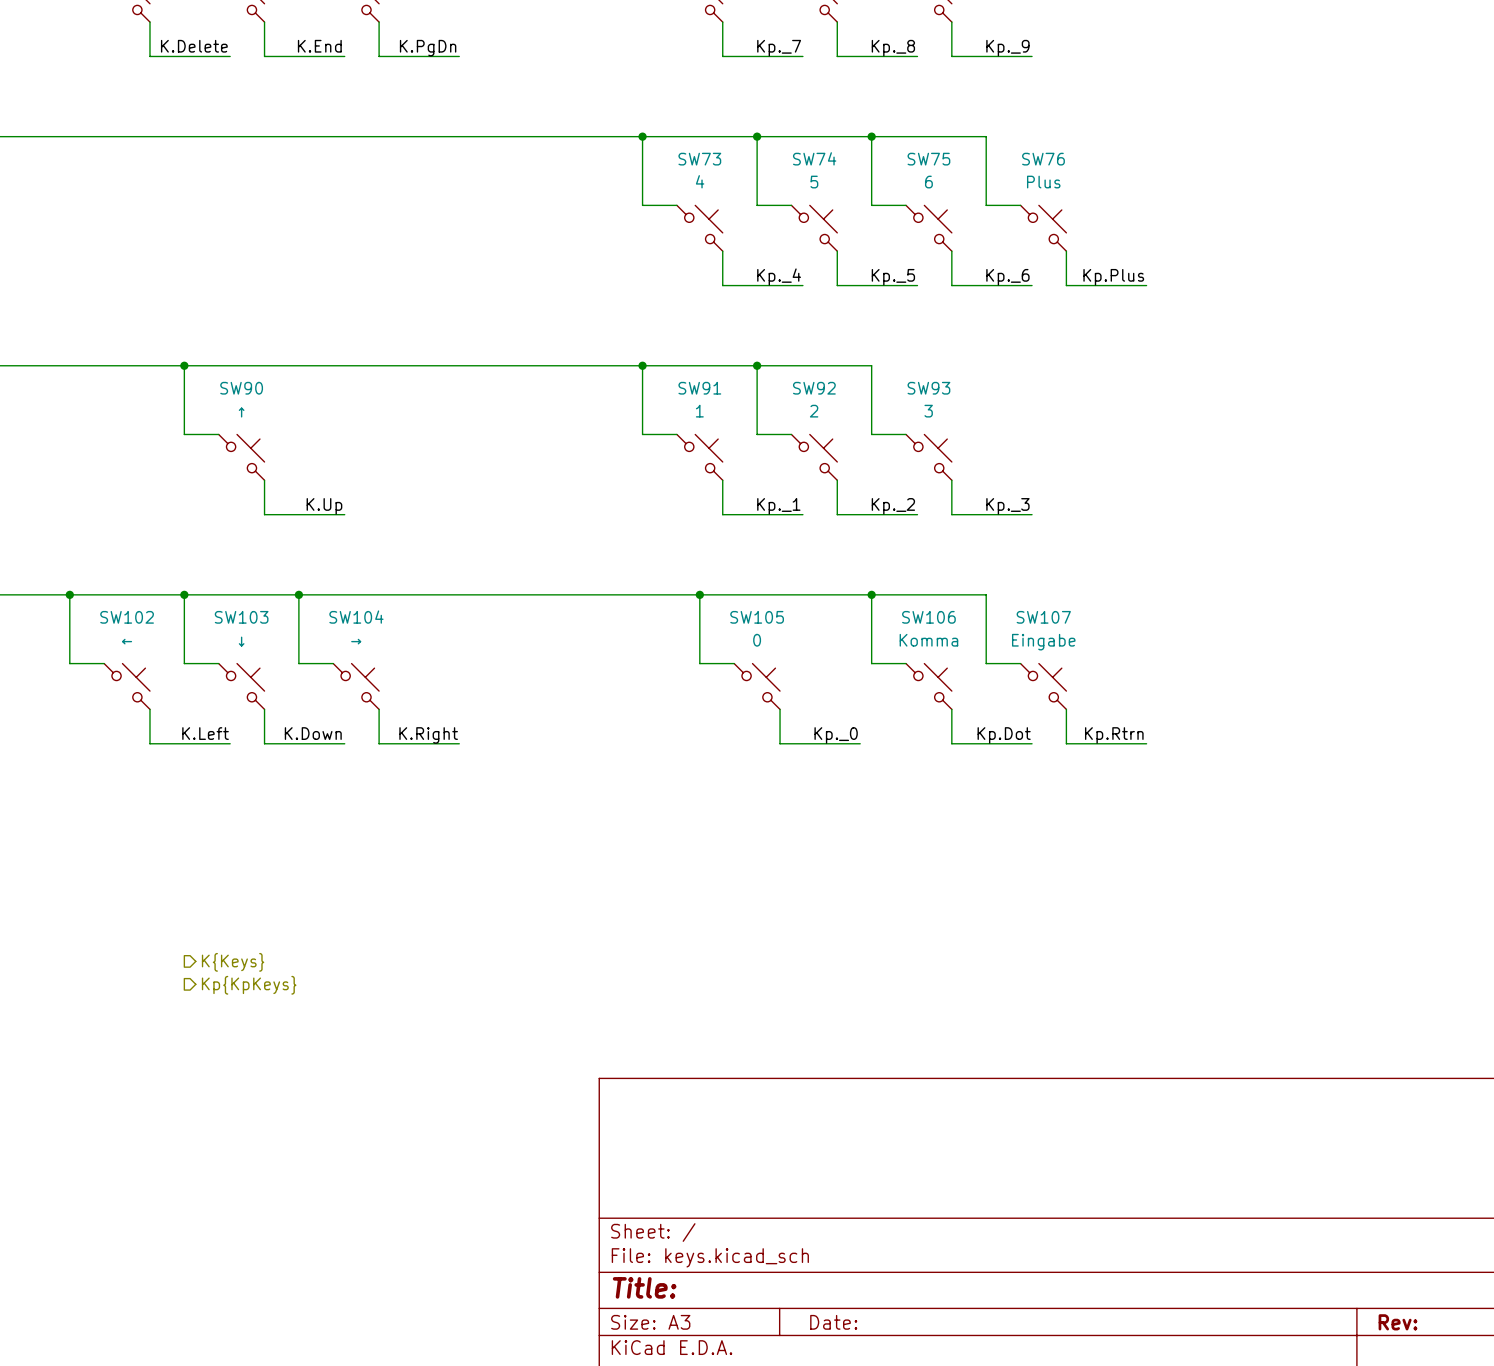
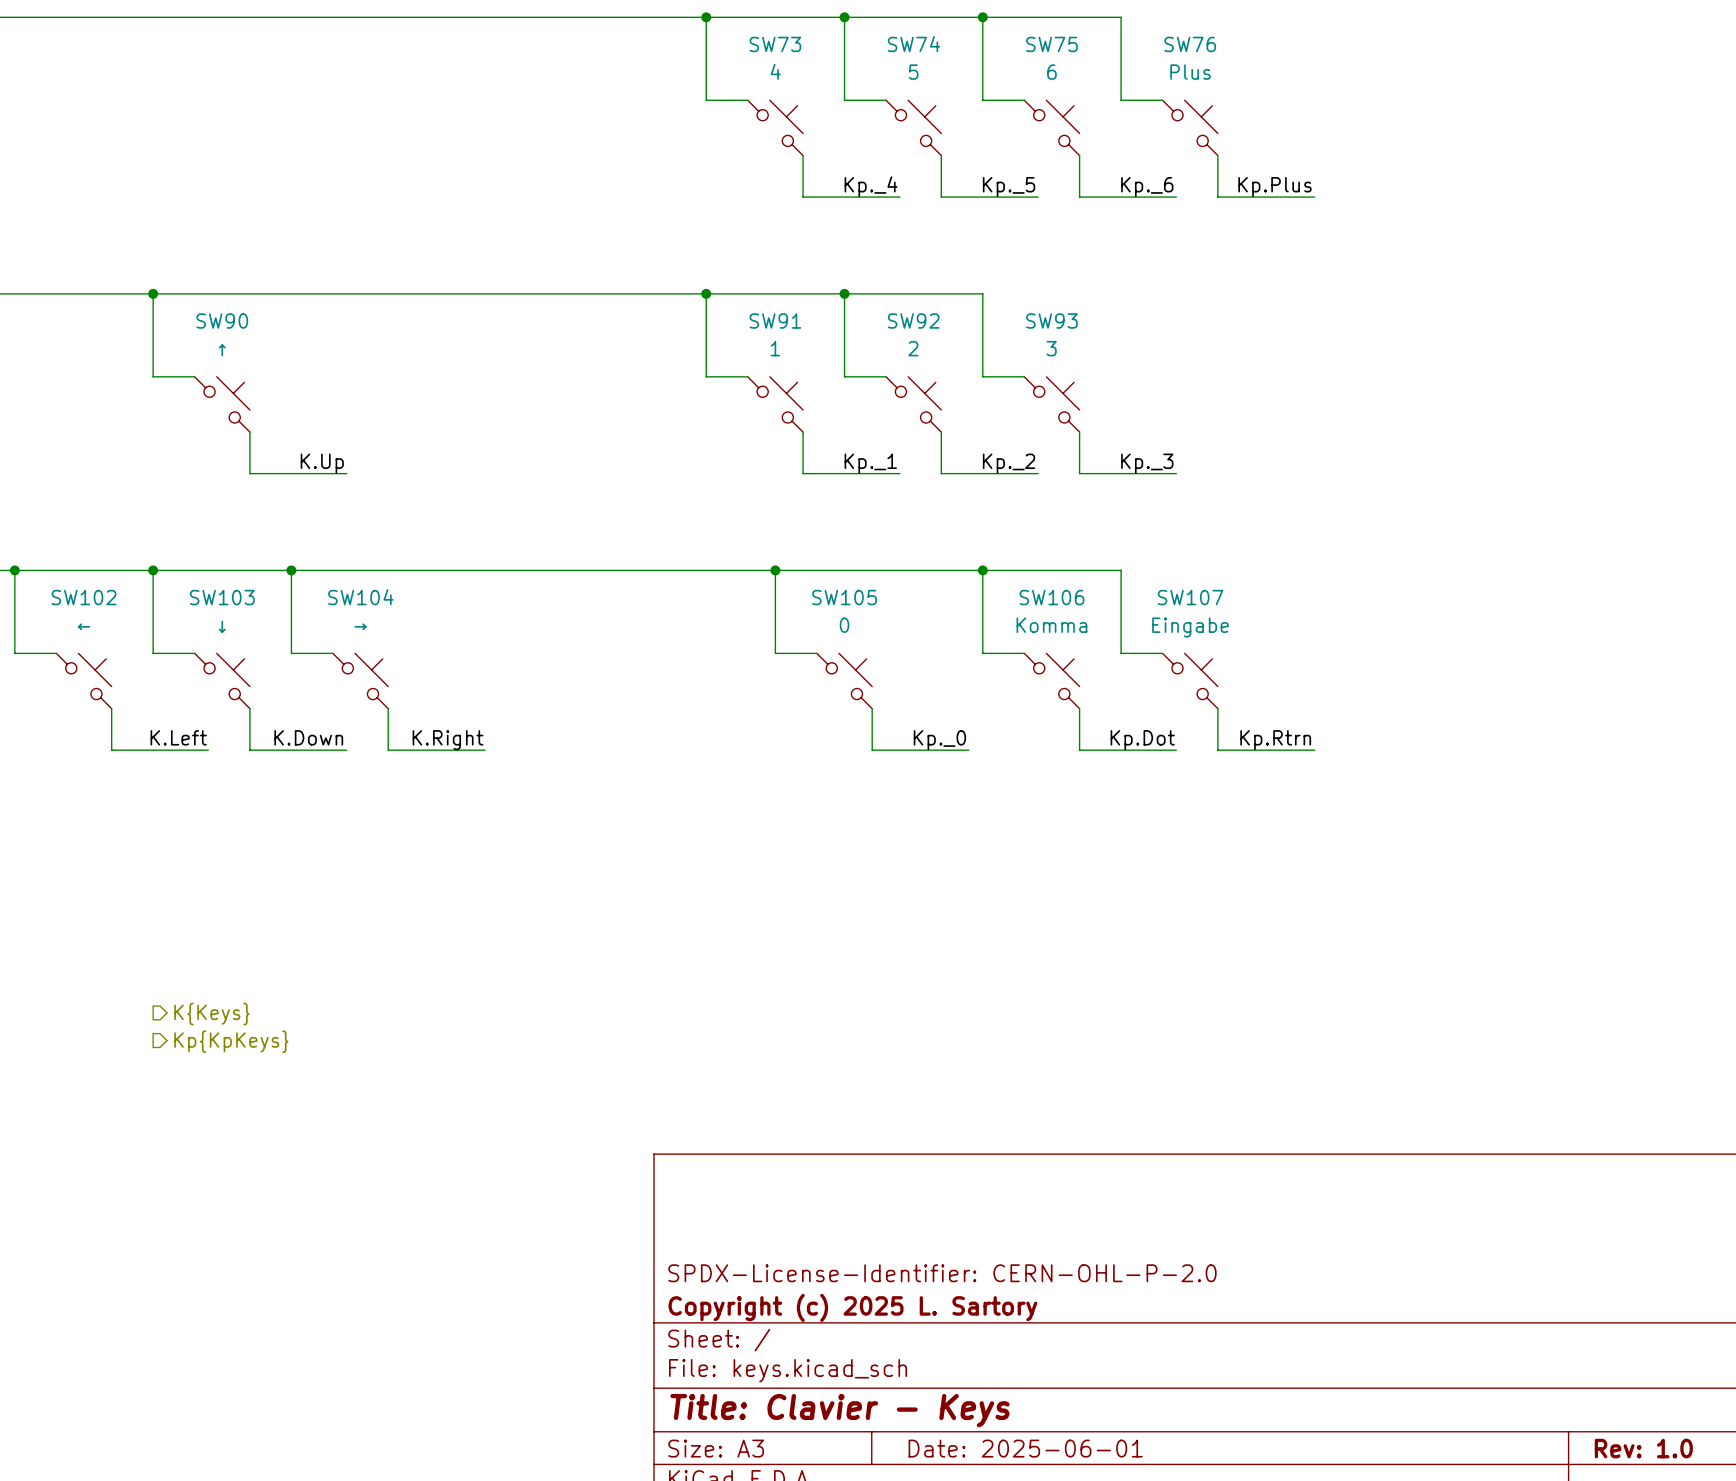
title block: none -> SPDX-License-Identifier: CERN-OHL-P-2.0 (942, 1273)
title block: none -> Copyright (c) 2025 L. Sartory (852, 1307)
title block: Title: (644, 1287) -> Title: Clavier - Keys (840, 1410)
title block: Date: (833, 1322) -> Date: 2025-06-01 (1025, 1448)
title block: Rev: (1398, 1322) -> Rev: 1.0 (1643, 1448)

